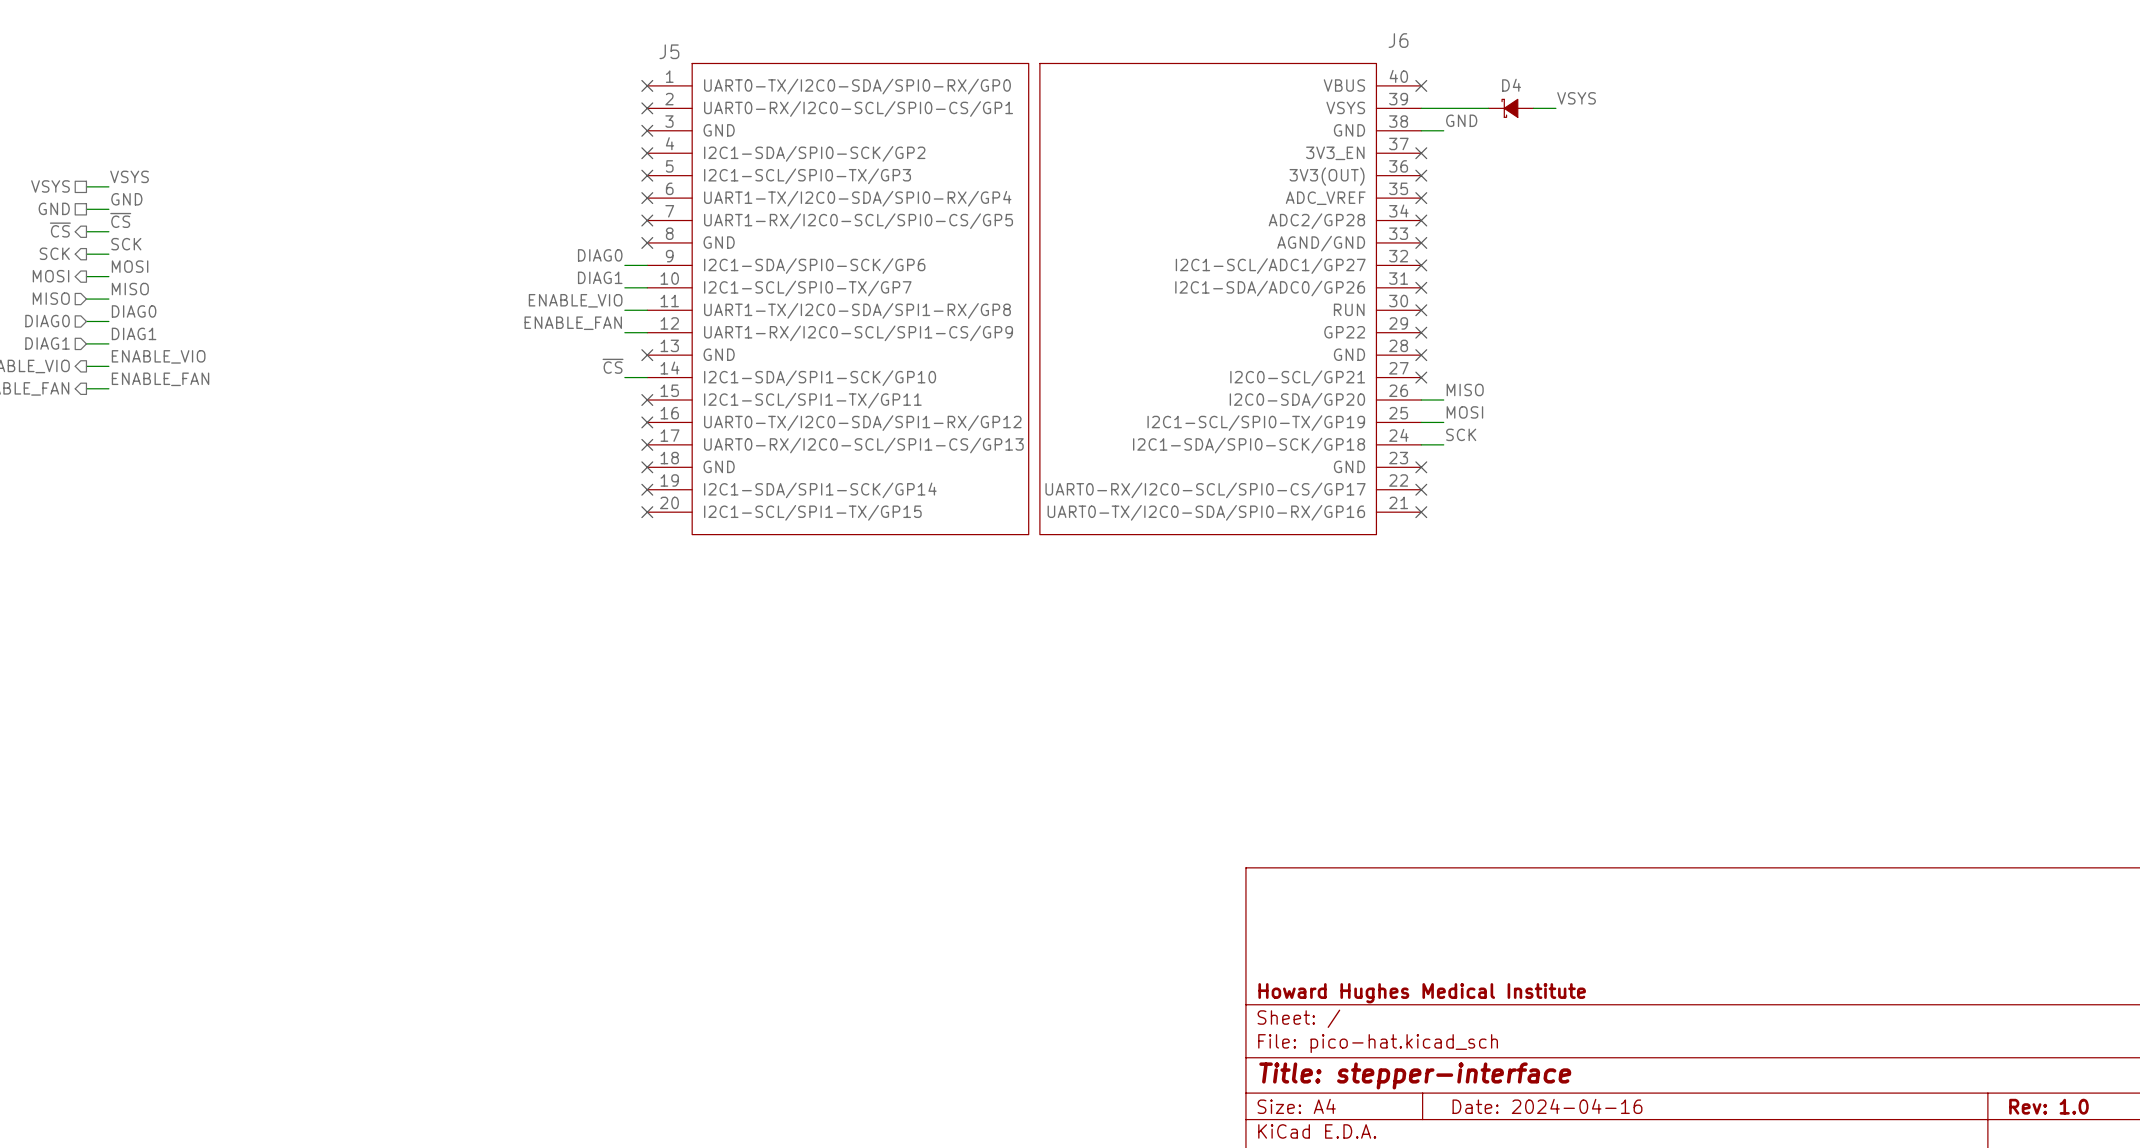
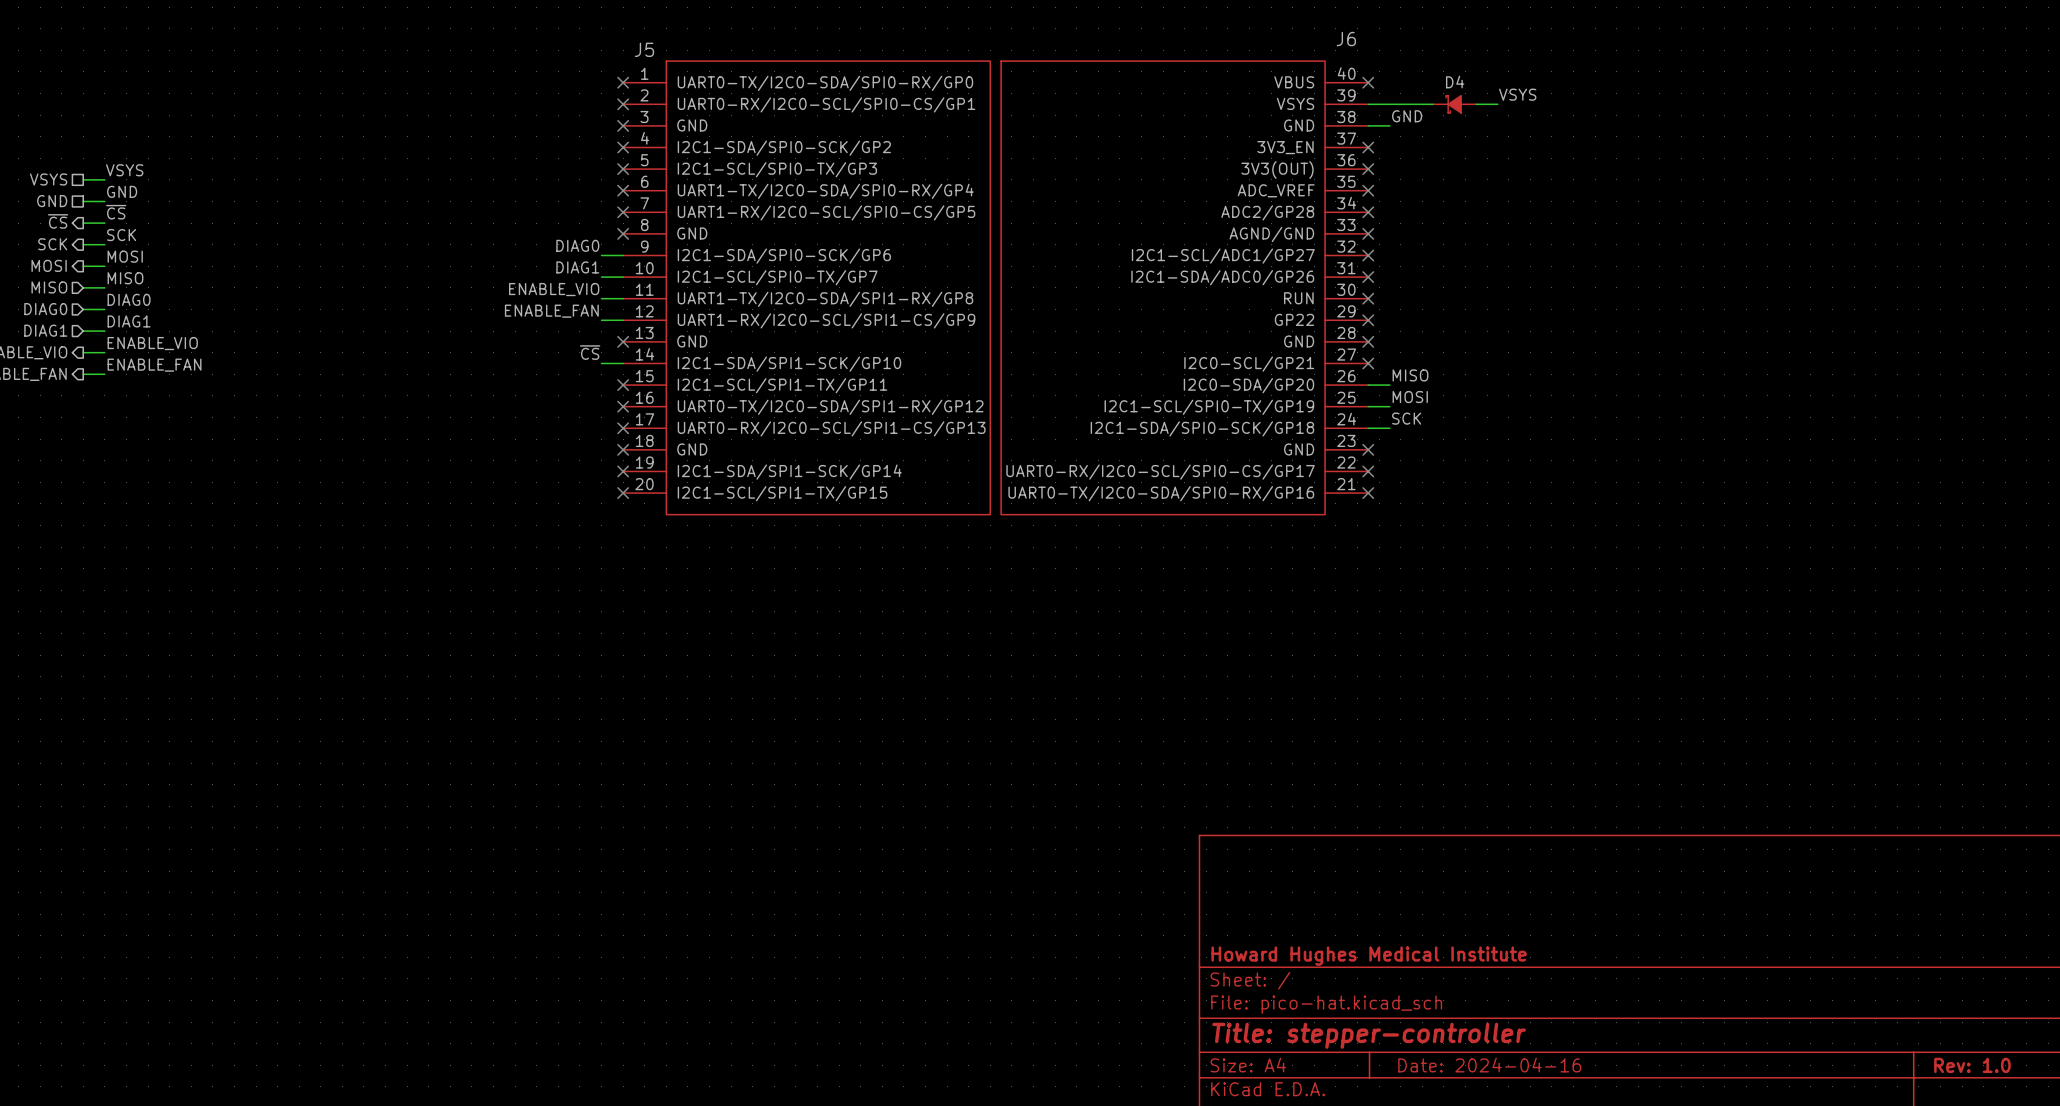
title block: Title: stepper-interface (1415, 1075) -> Title: stepper-controller (1369, 1035)

